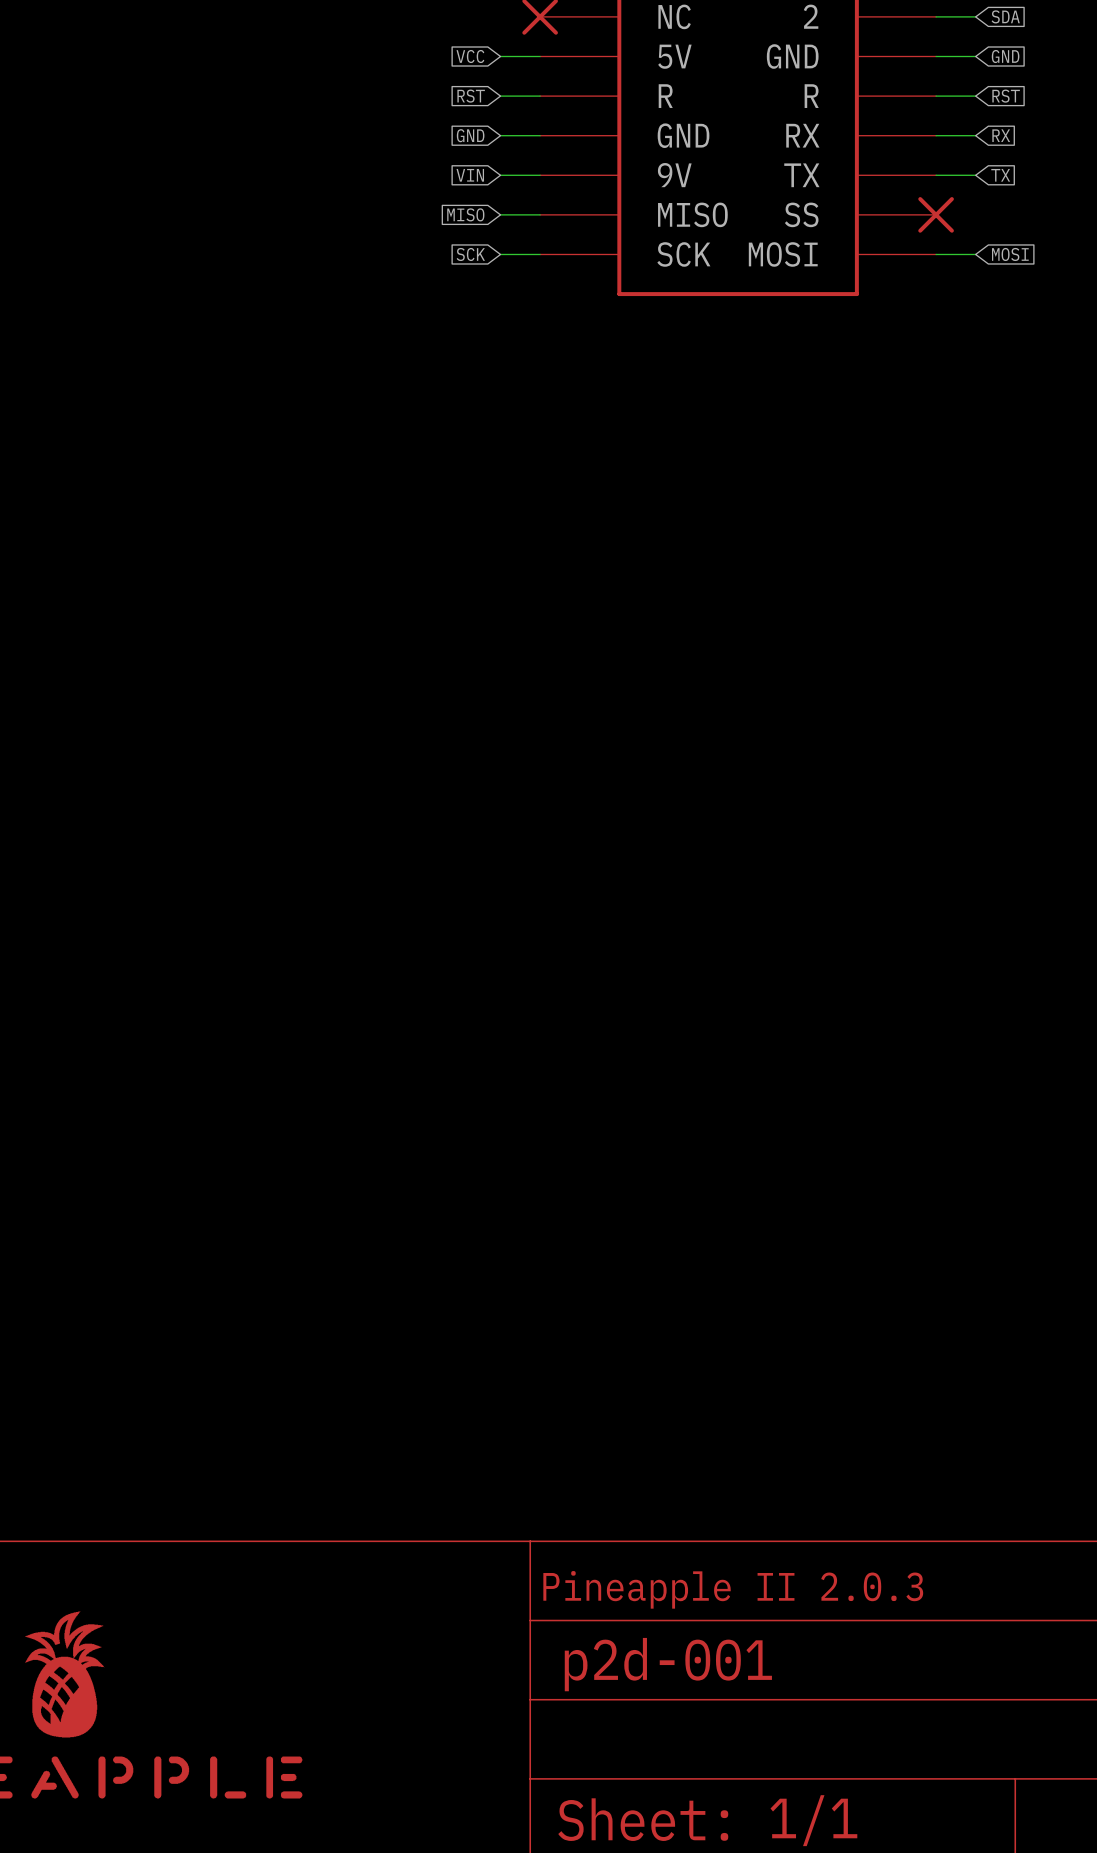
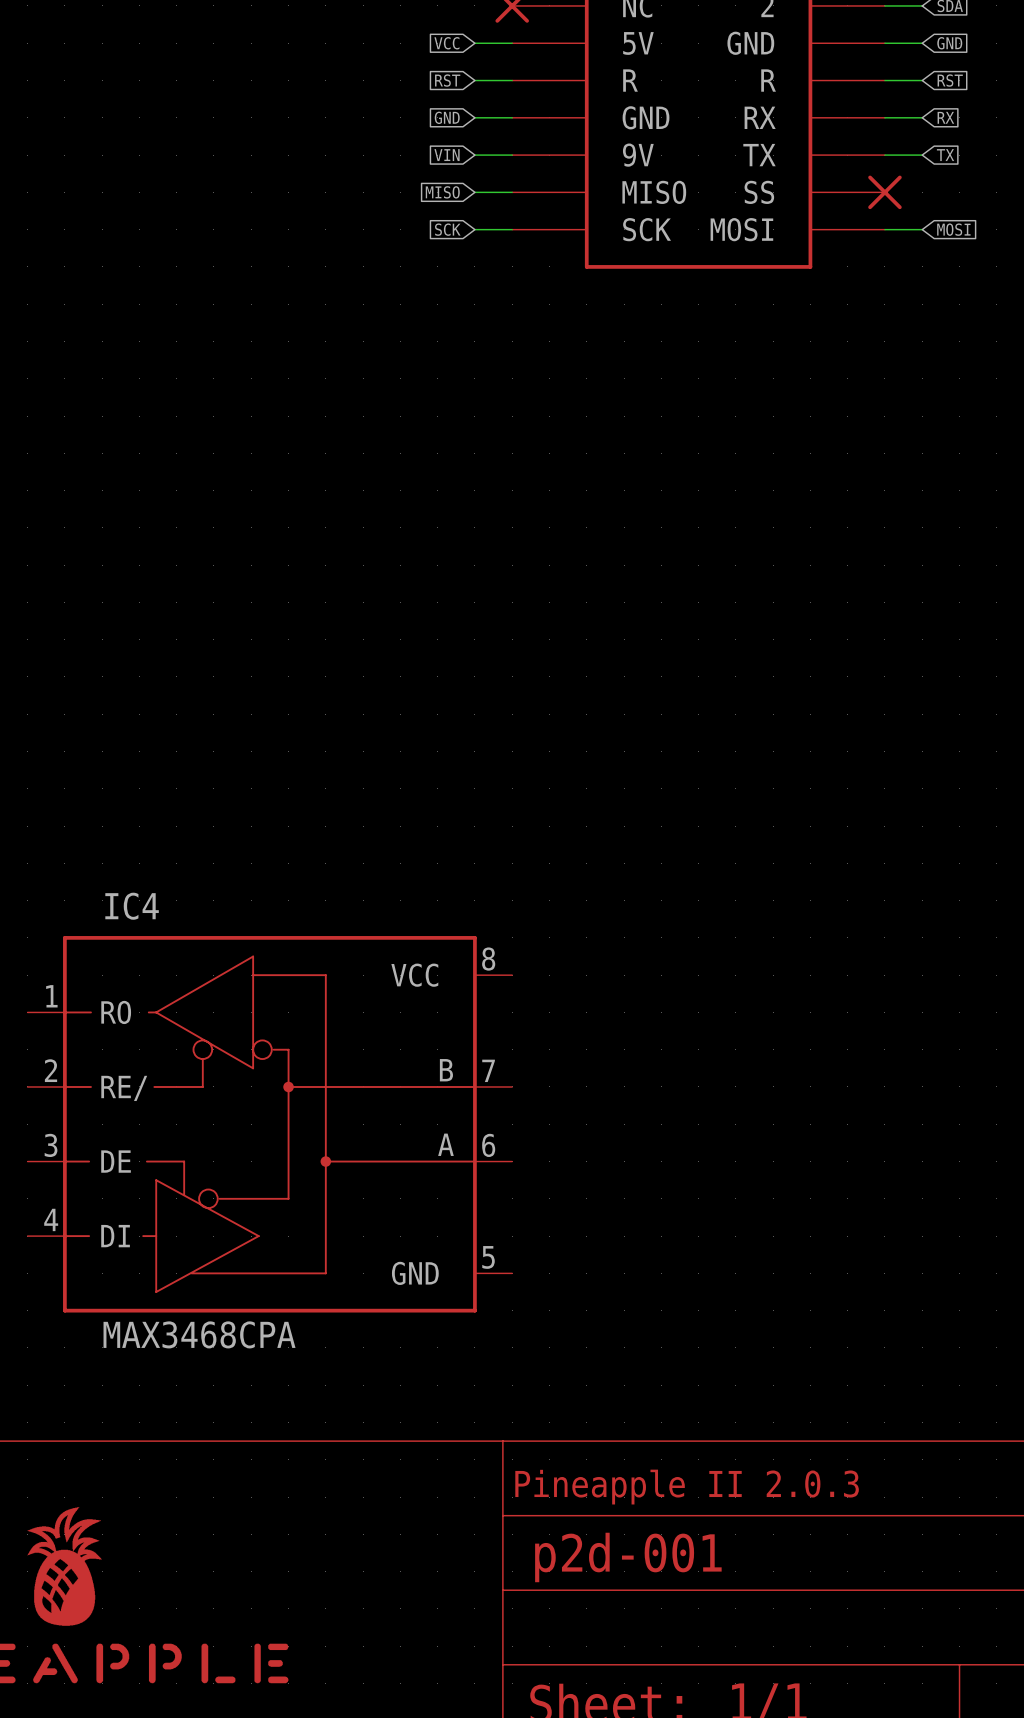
IC4: none -> MAX3468CPA (269, 1124)

